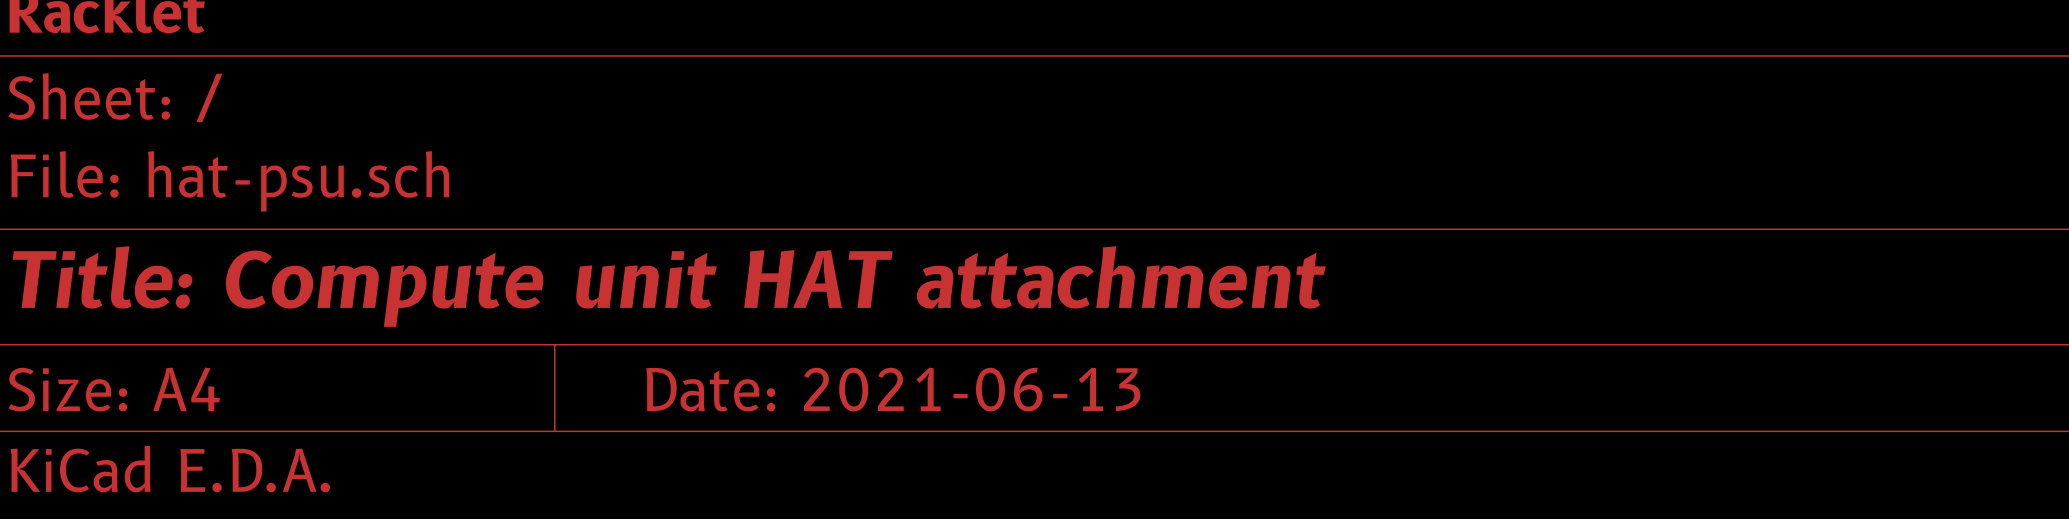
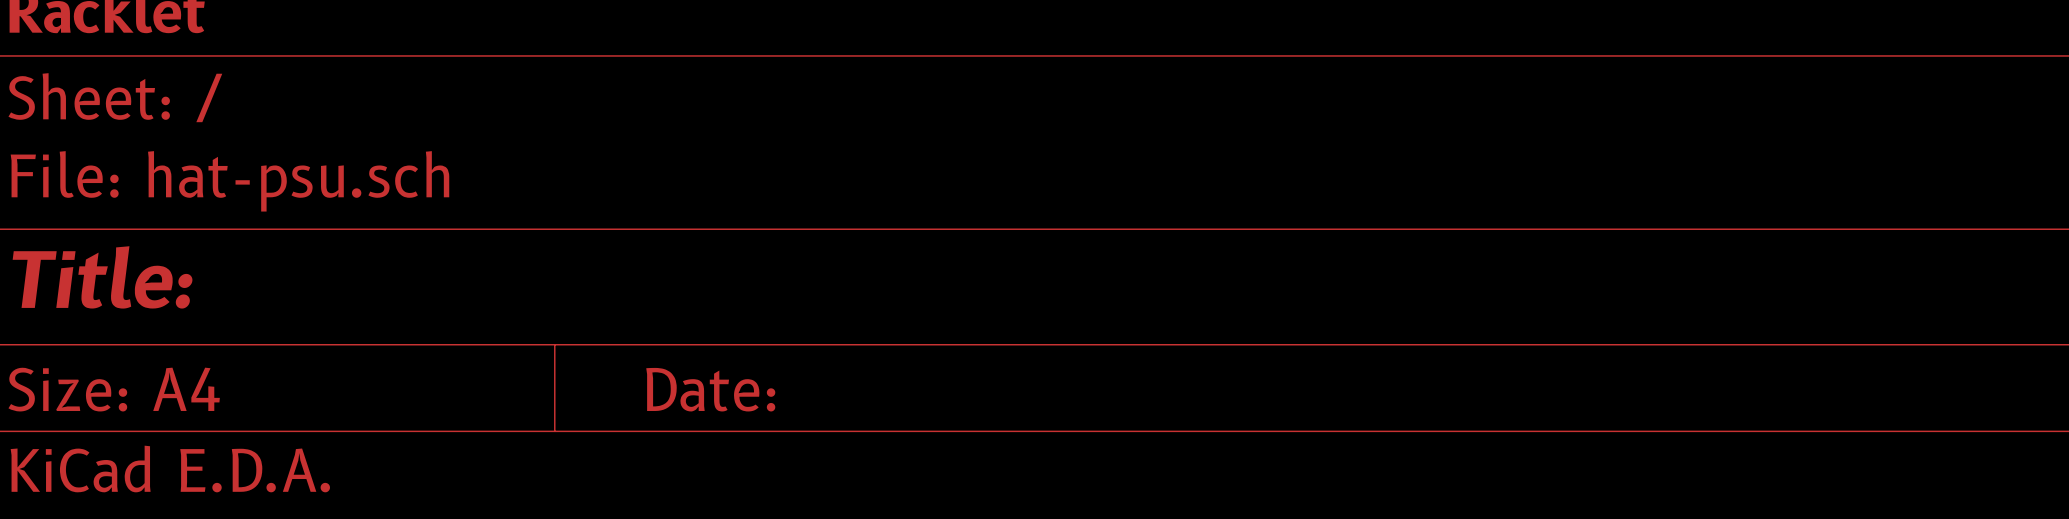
title block: Title: Compute unit HAT attachment (669, 286) -> Title: (102, 277)
title block: Date: 2021-06-13 (893, 389) -> Date: (710, 389)

